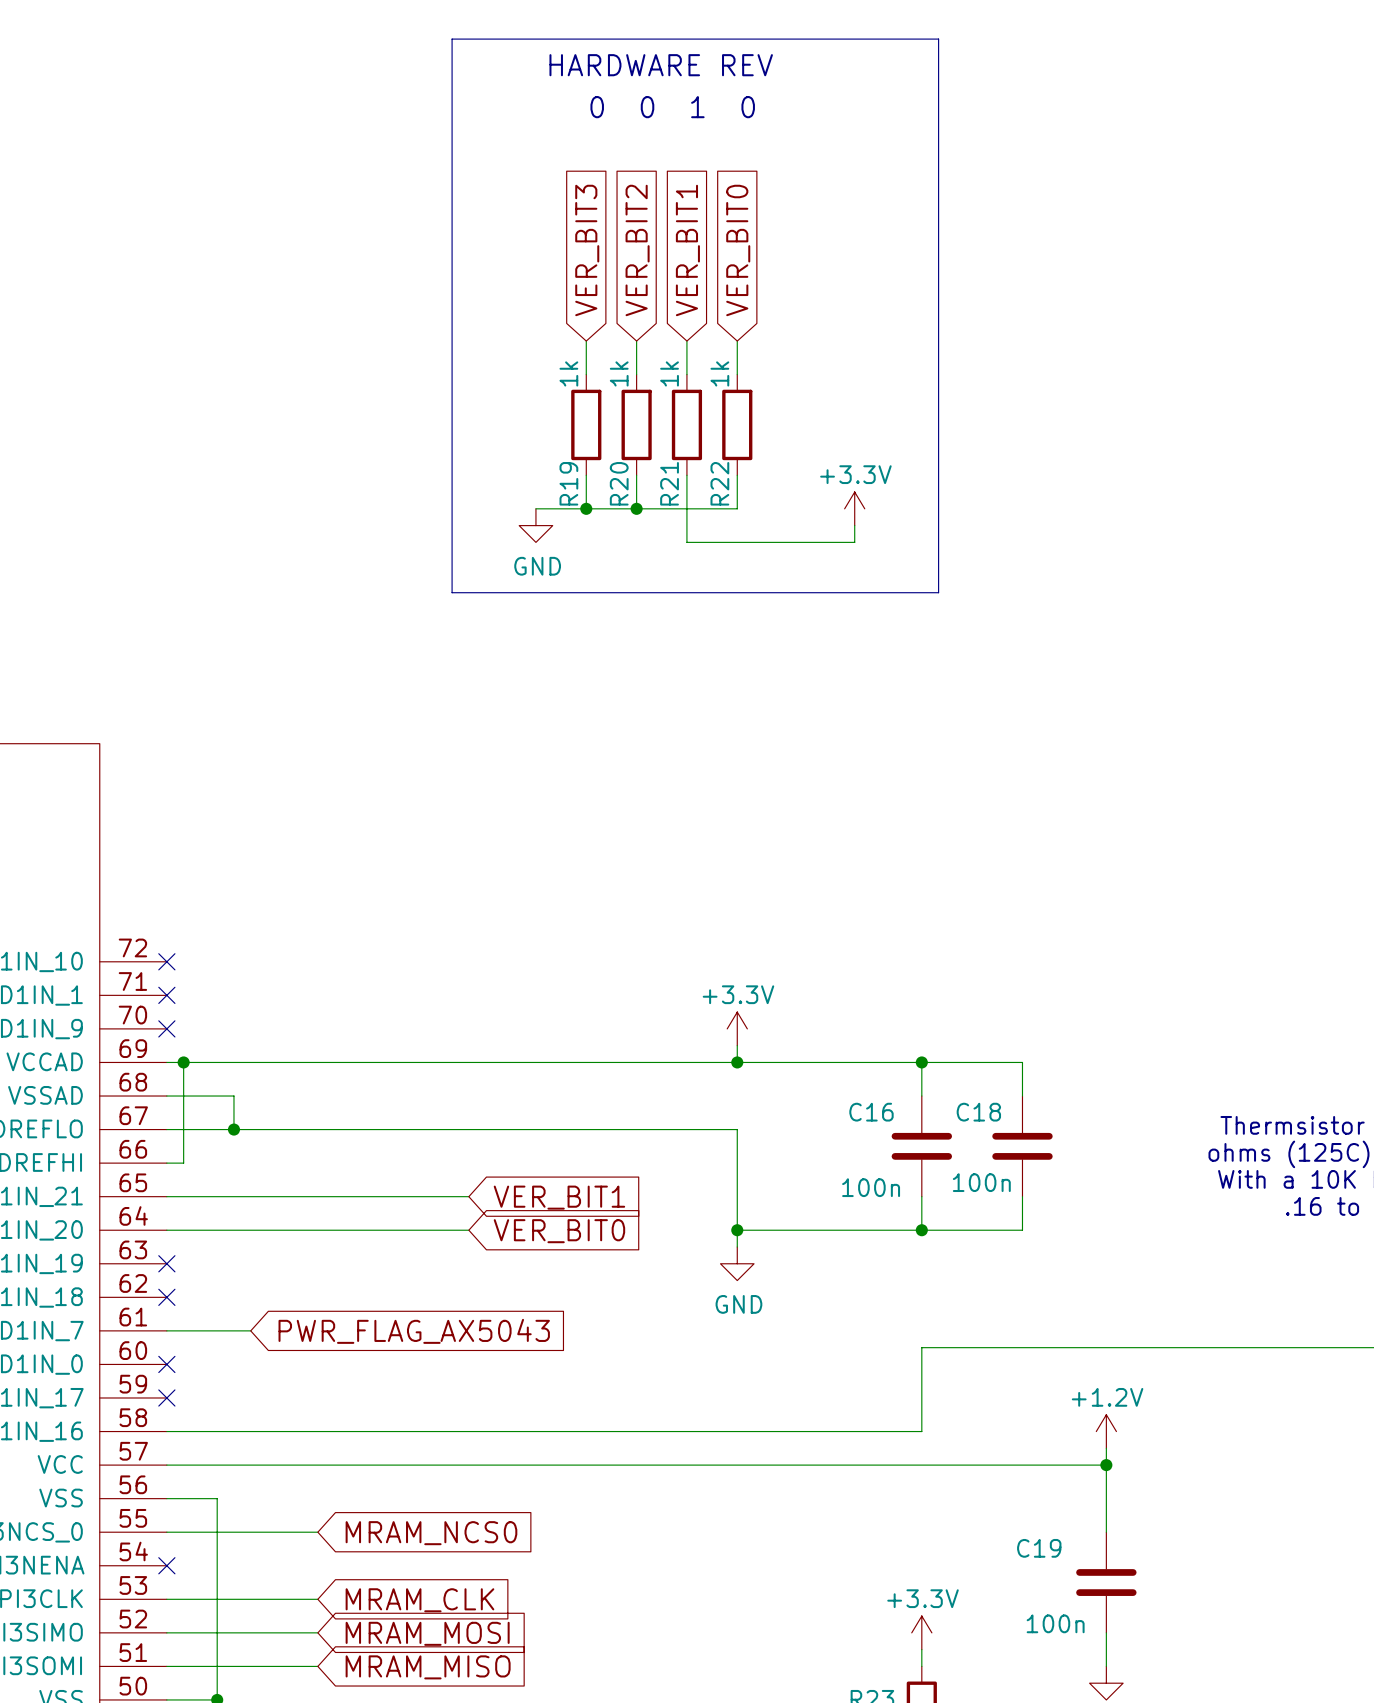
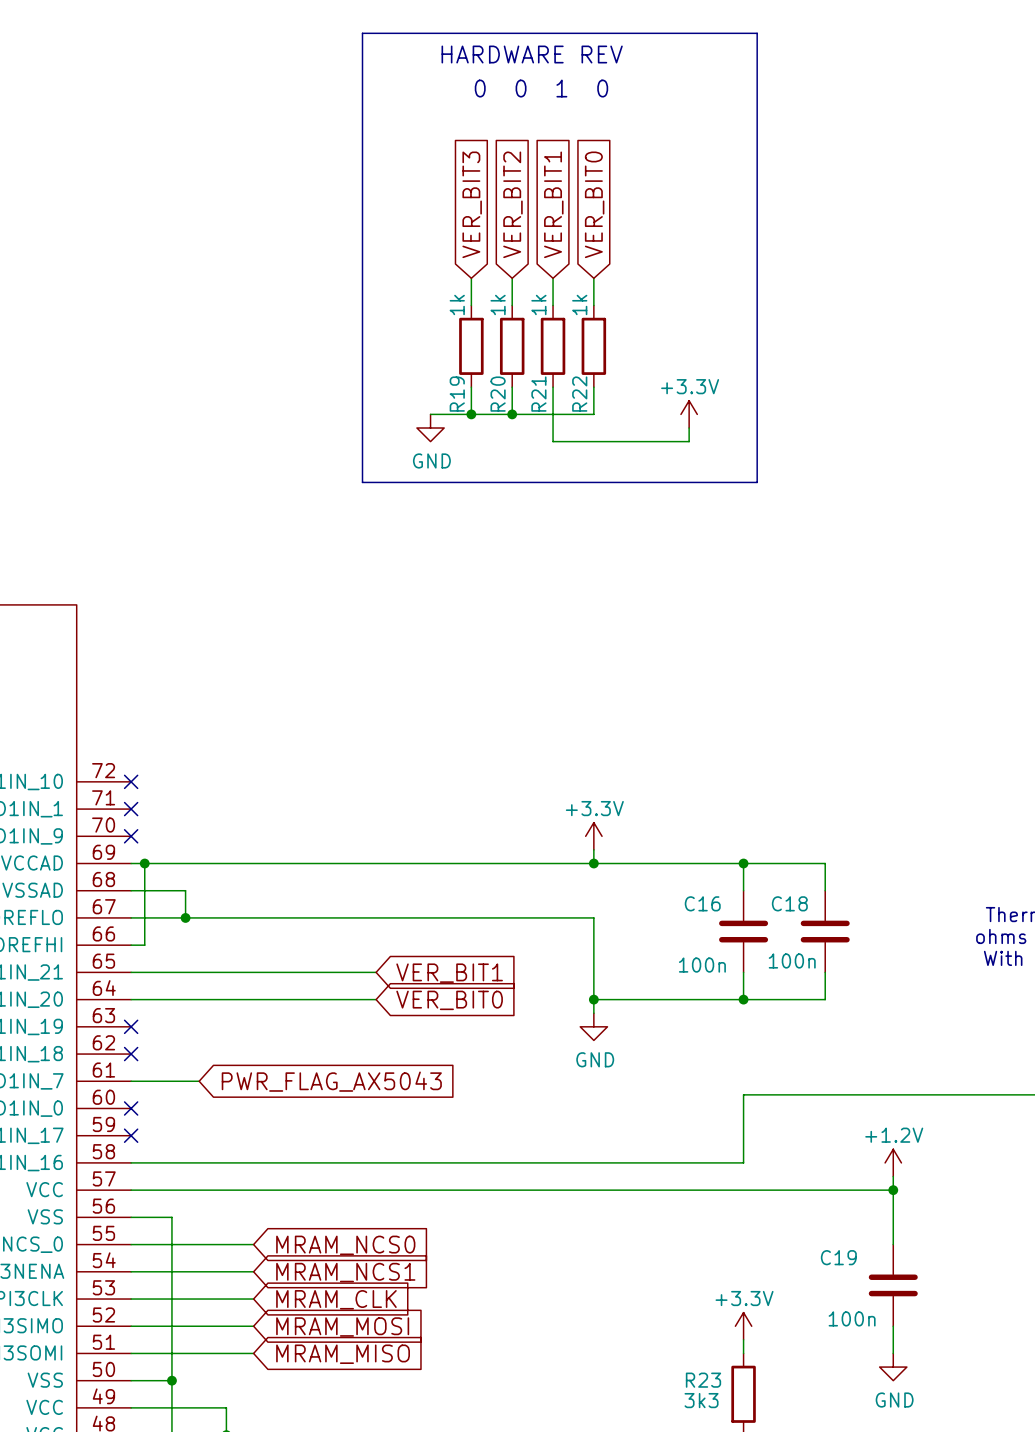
wire: none -> (131, 1271) (253, 1271)
no-connect mark: (166, 1565) -> none
global label: none -> MRAM_NCS1 (345, 1272)

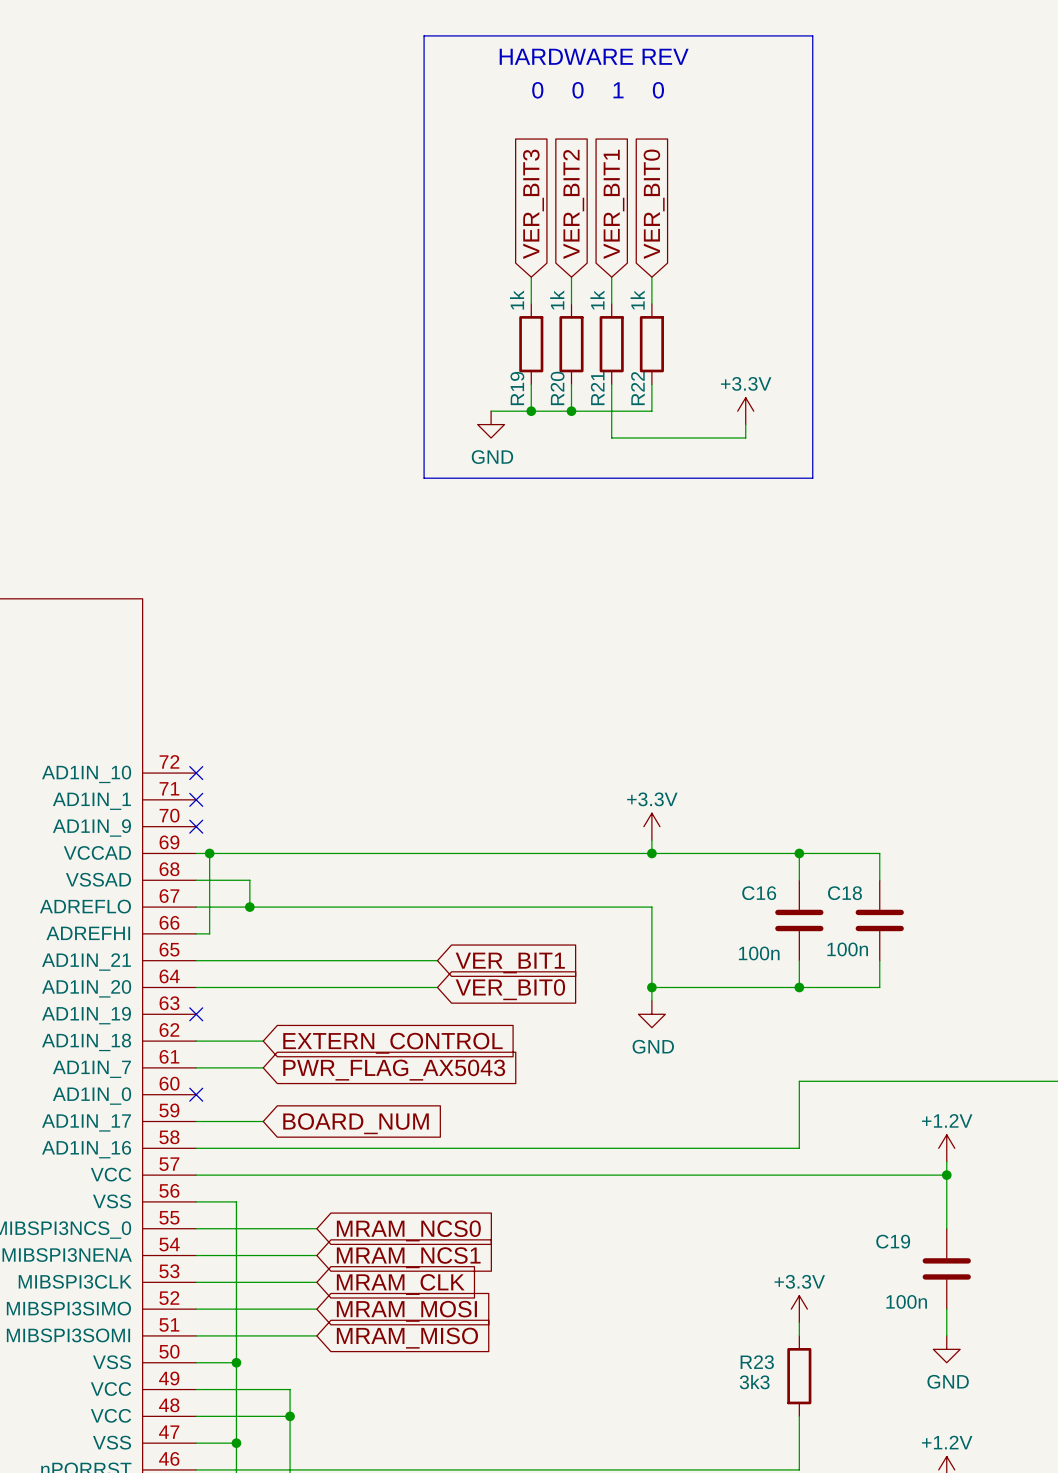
wire: none -> (196, 1041) (263, 1041)
no-connect mark: (131, 1054) -> none
global label: none -> EXTERN_CONTROL (392, 1043)
wire: none -> (196, 1121) (263, 1121)
no-connect mark: (131, 1135) -> none
global label: none -> BOARD_NUM (356, 1123)

